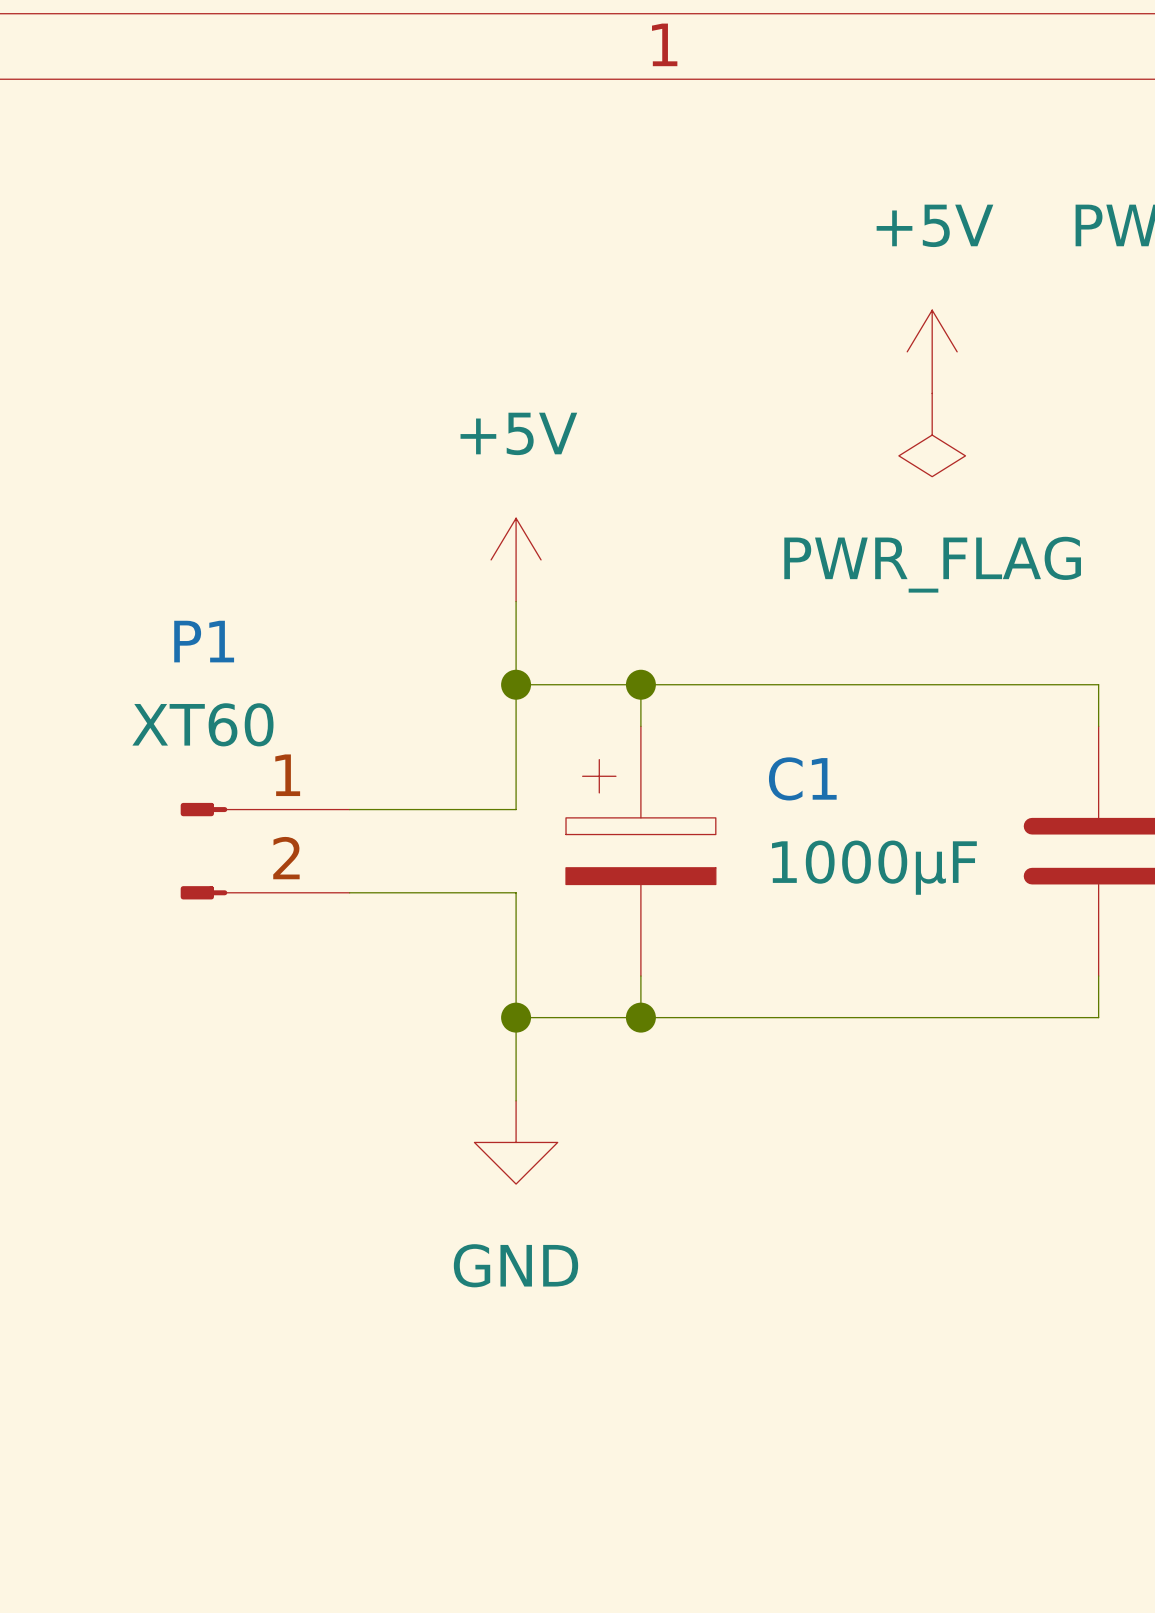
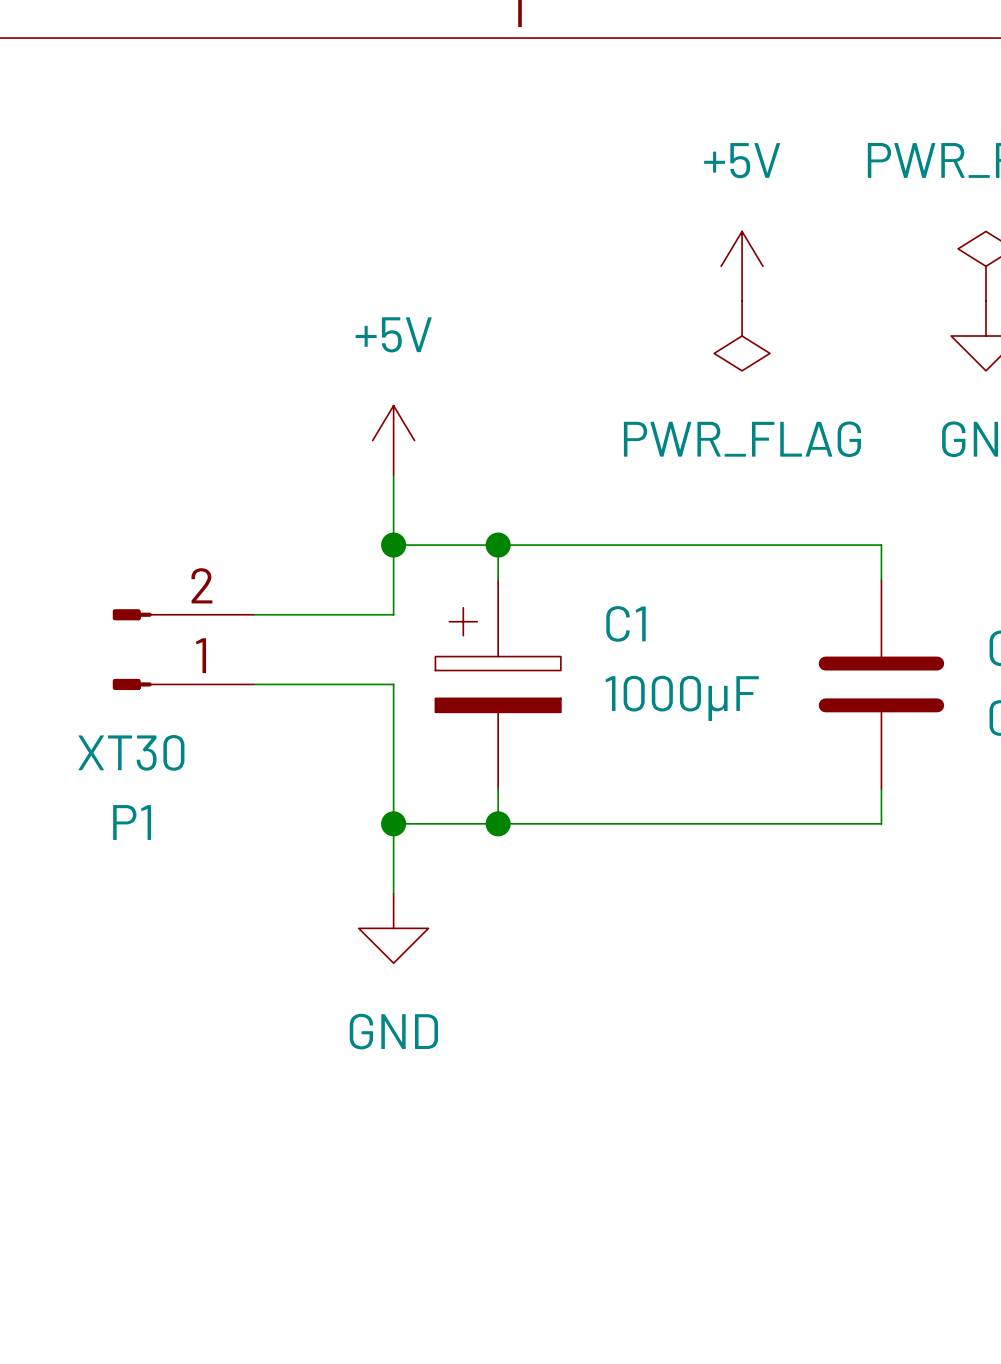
P1 value: XT60 (202, 724) -> XT30 (131, 752)
wire: (516, 767) (516, 809) (349, 809) -> (393, 614) (254, 614)
P1 flip: as is (203, 851) -> up-down (132, 649)
wire: (349, 892) (516, 892) -> (254, 684) (393, 684) (393, 719)

